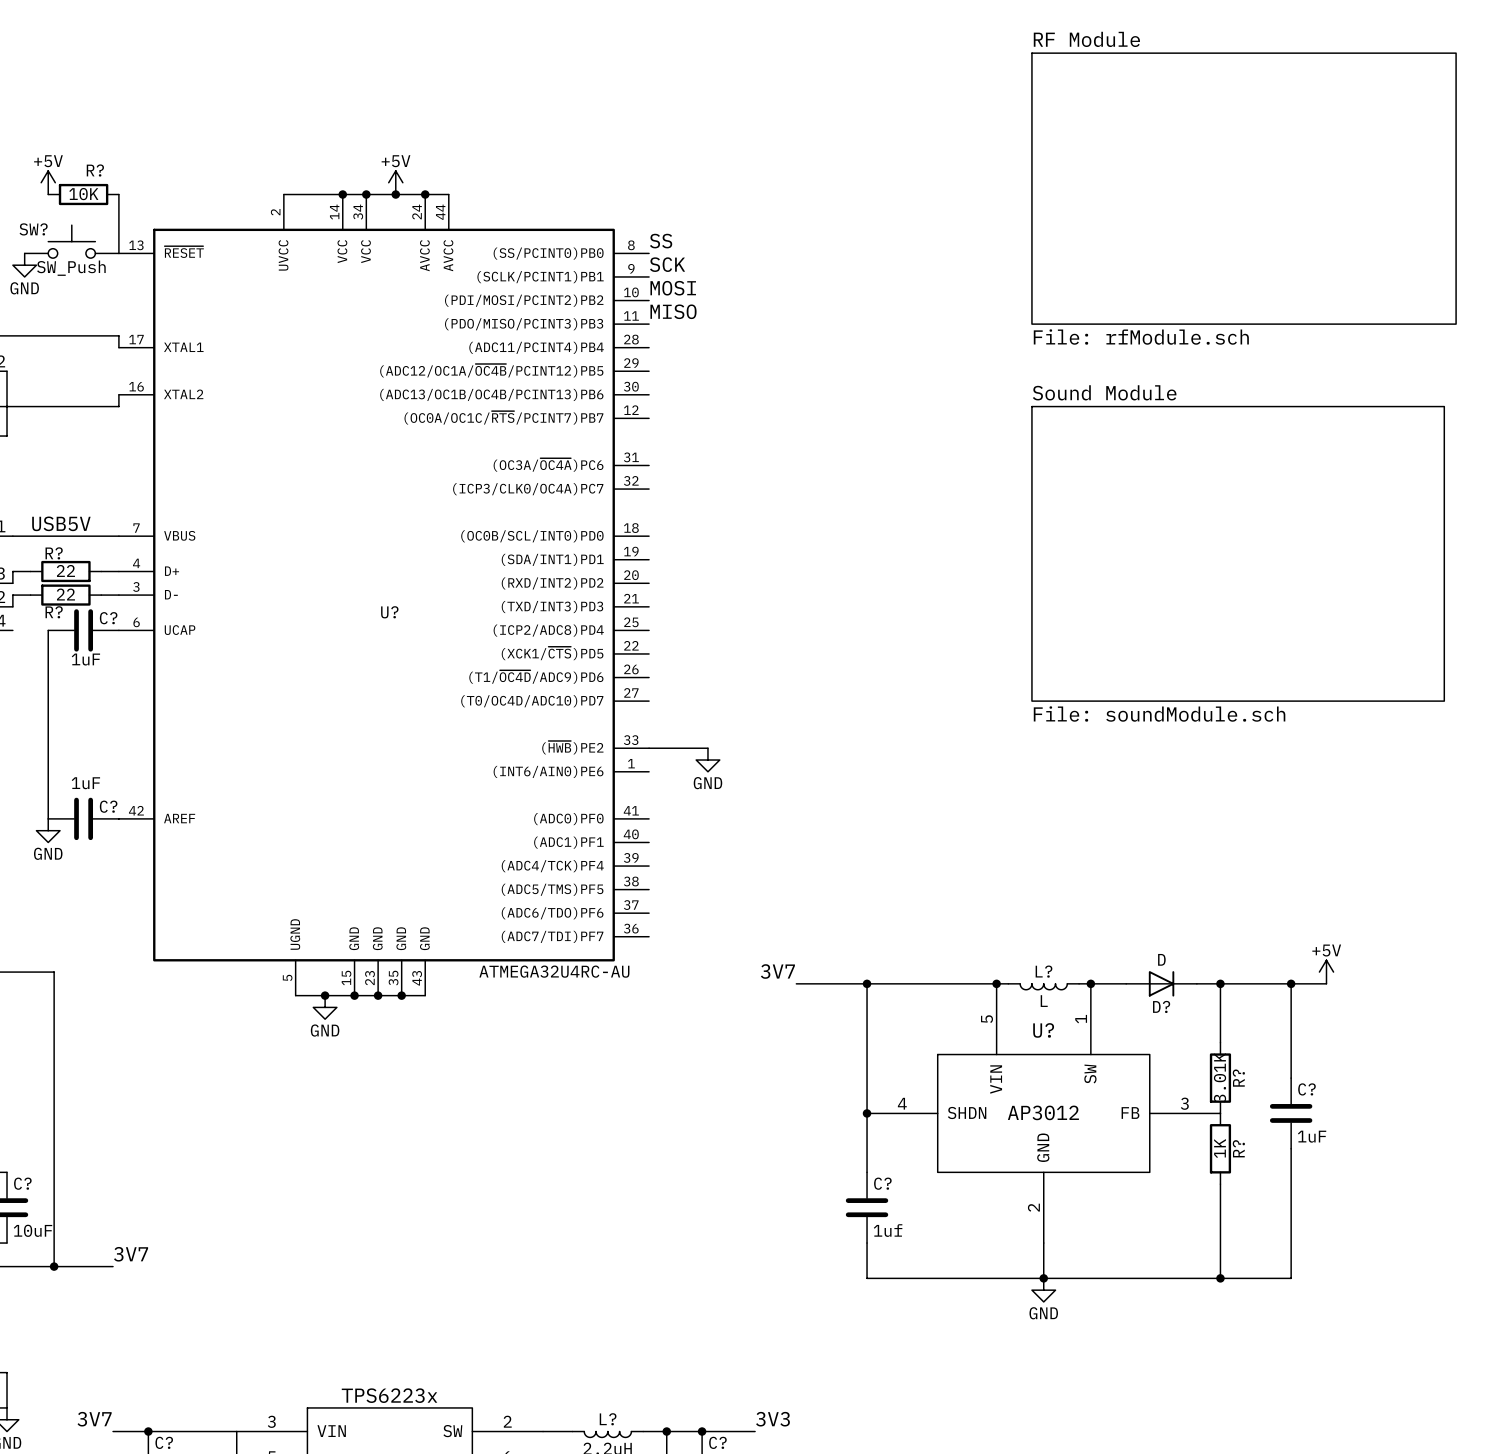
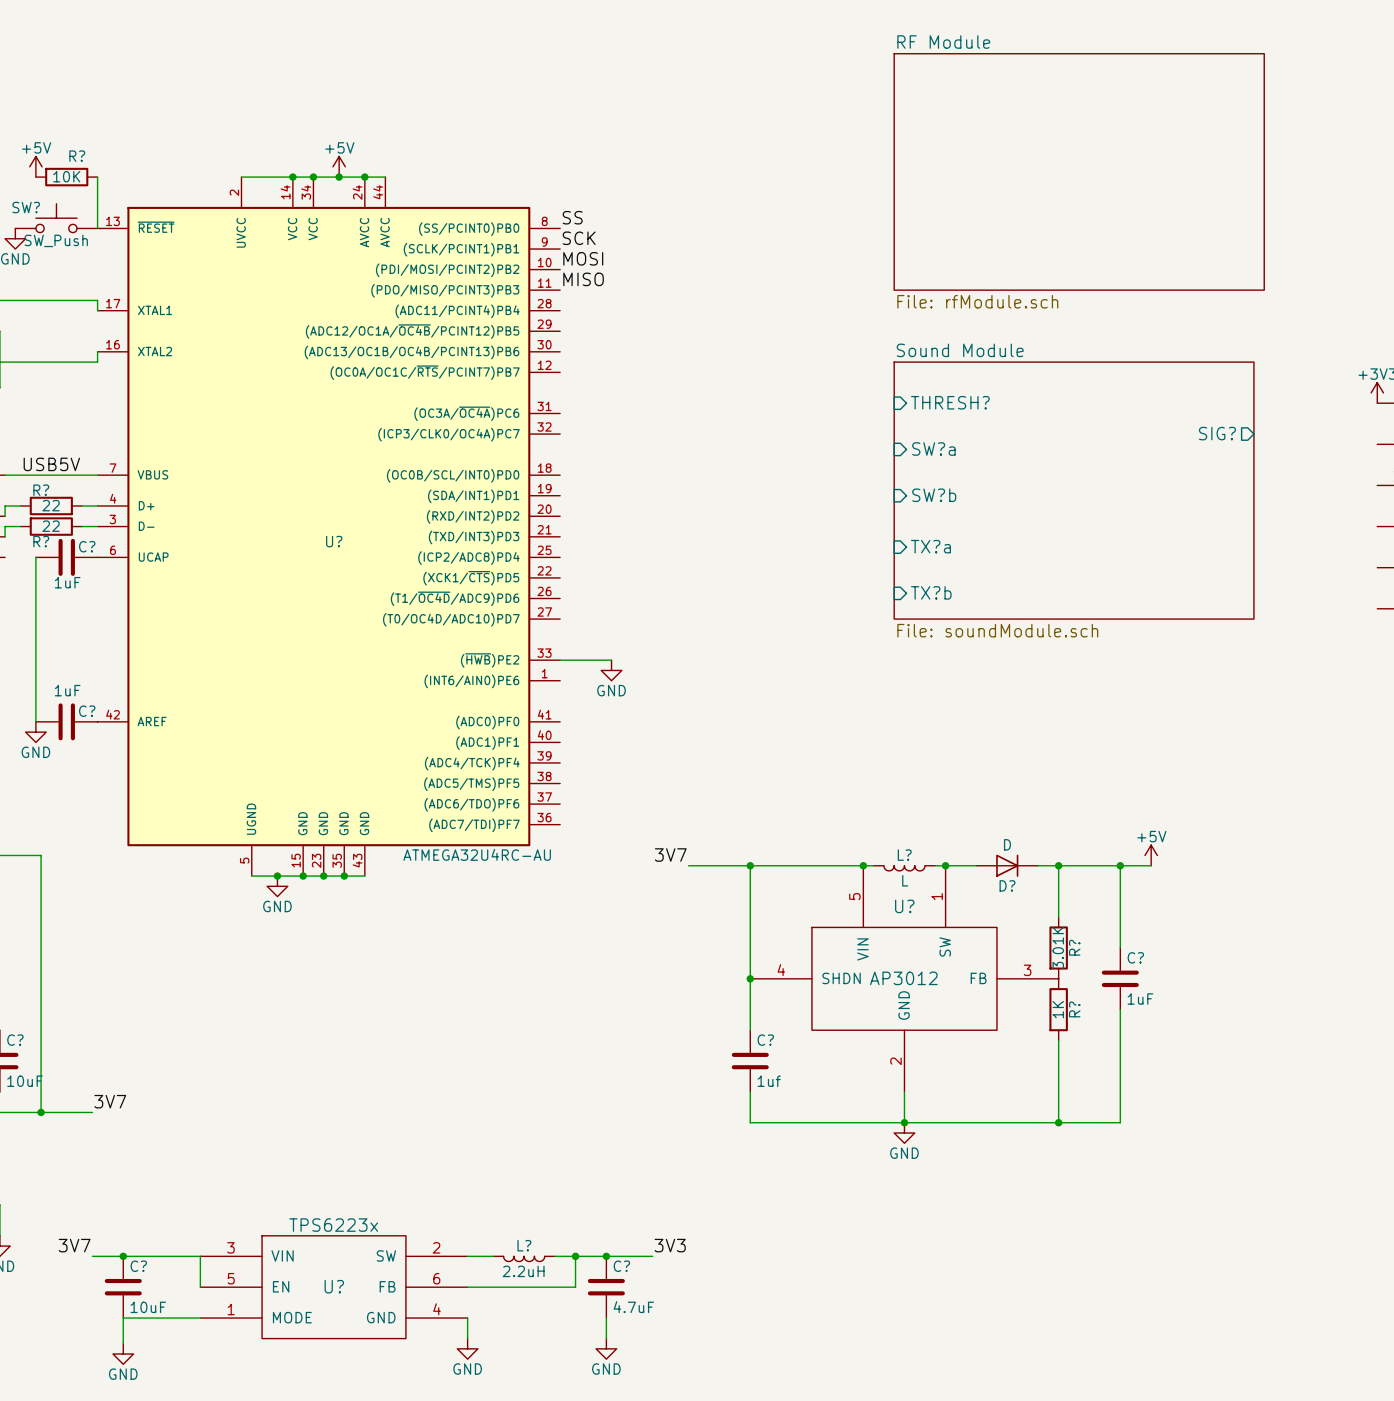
sheet pin: none -> THRESH? (950, 402)
sheet pin: none -> SIG? (1217, 433)
sheet pin: none -> SW?a (933, 449)
sheet pin: none -> SW?b (934, 495)
sheet pin: none -> TX?a (930, 546)
sheet pin: none -> TX?b (931, 592)

